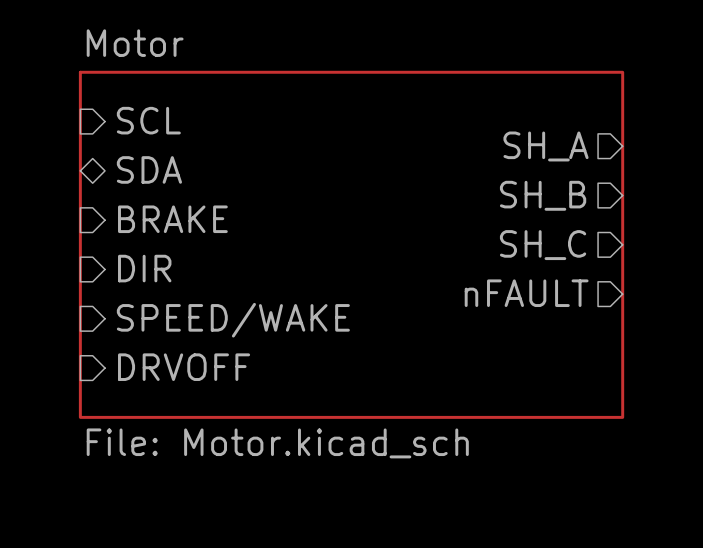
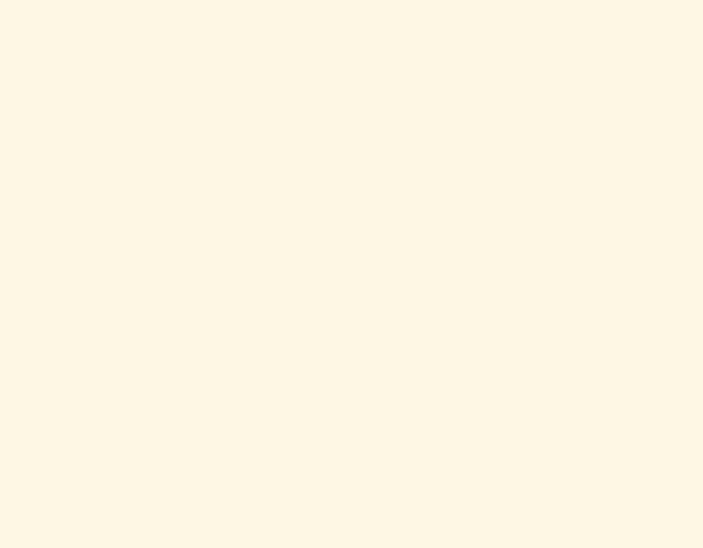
sheet pin: SCL (148, 120) -> none
sheet pin: SH_A (546, 146) -> none
sheet pin: SDA (149, 169) -> none
sheet pin: SH_B (543, 195) -> none
sheet pin: BRAKE (172, 219) -> none
sheet Motor: File: Motor.kicad_sch (351, 244) -> none
sheet pin: SH_C (543, 245) -> none
sheet pin: DIR (144, 268) -> none
sheet pin: nFAULT (526, 293) -> none
sheet pin: SPEED/WAKE (233, 320) -> none
sheet pin: DRVOFF (184, 367) -> none

